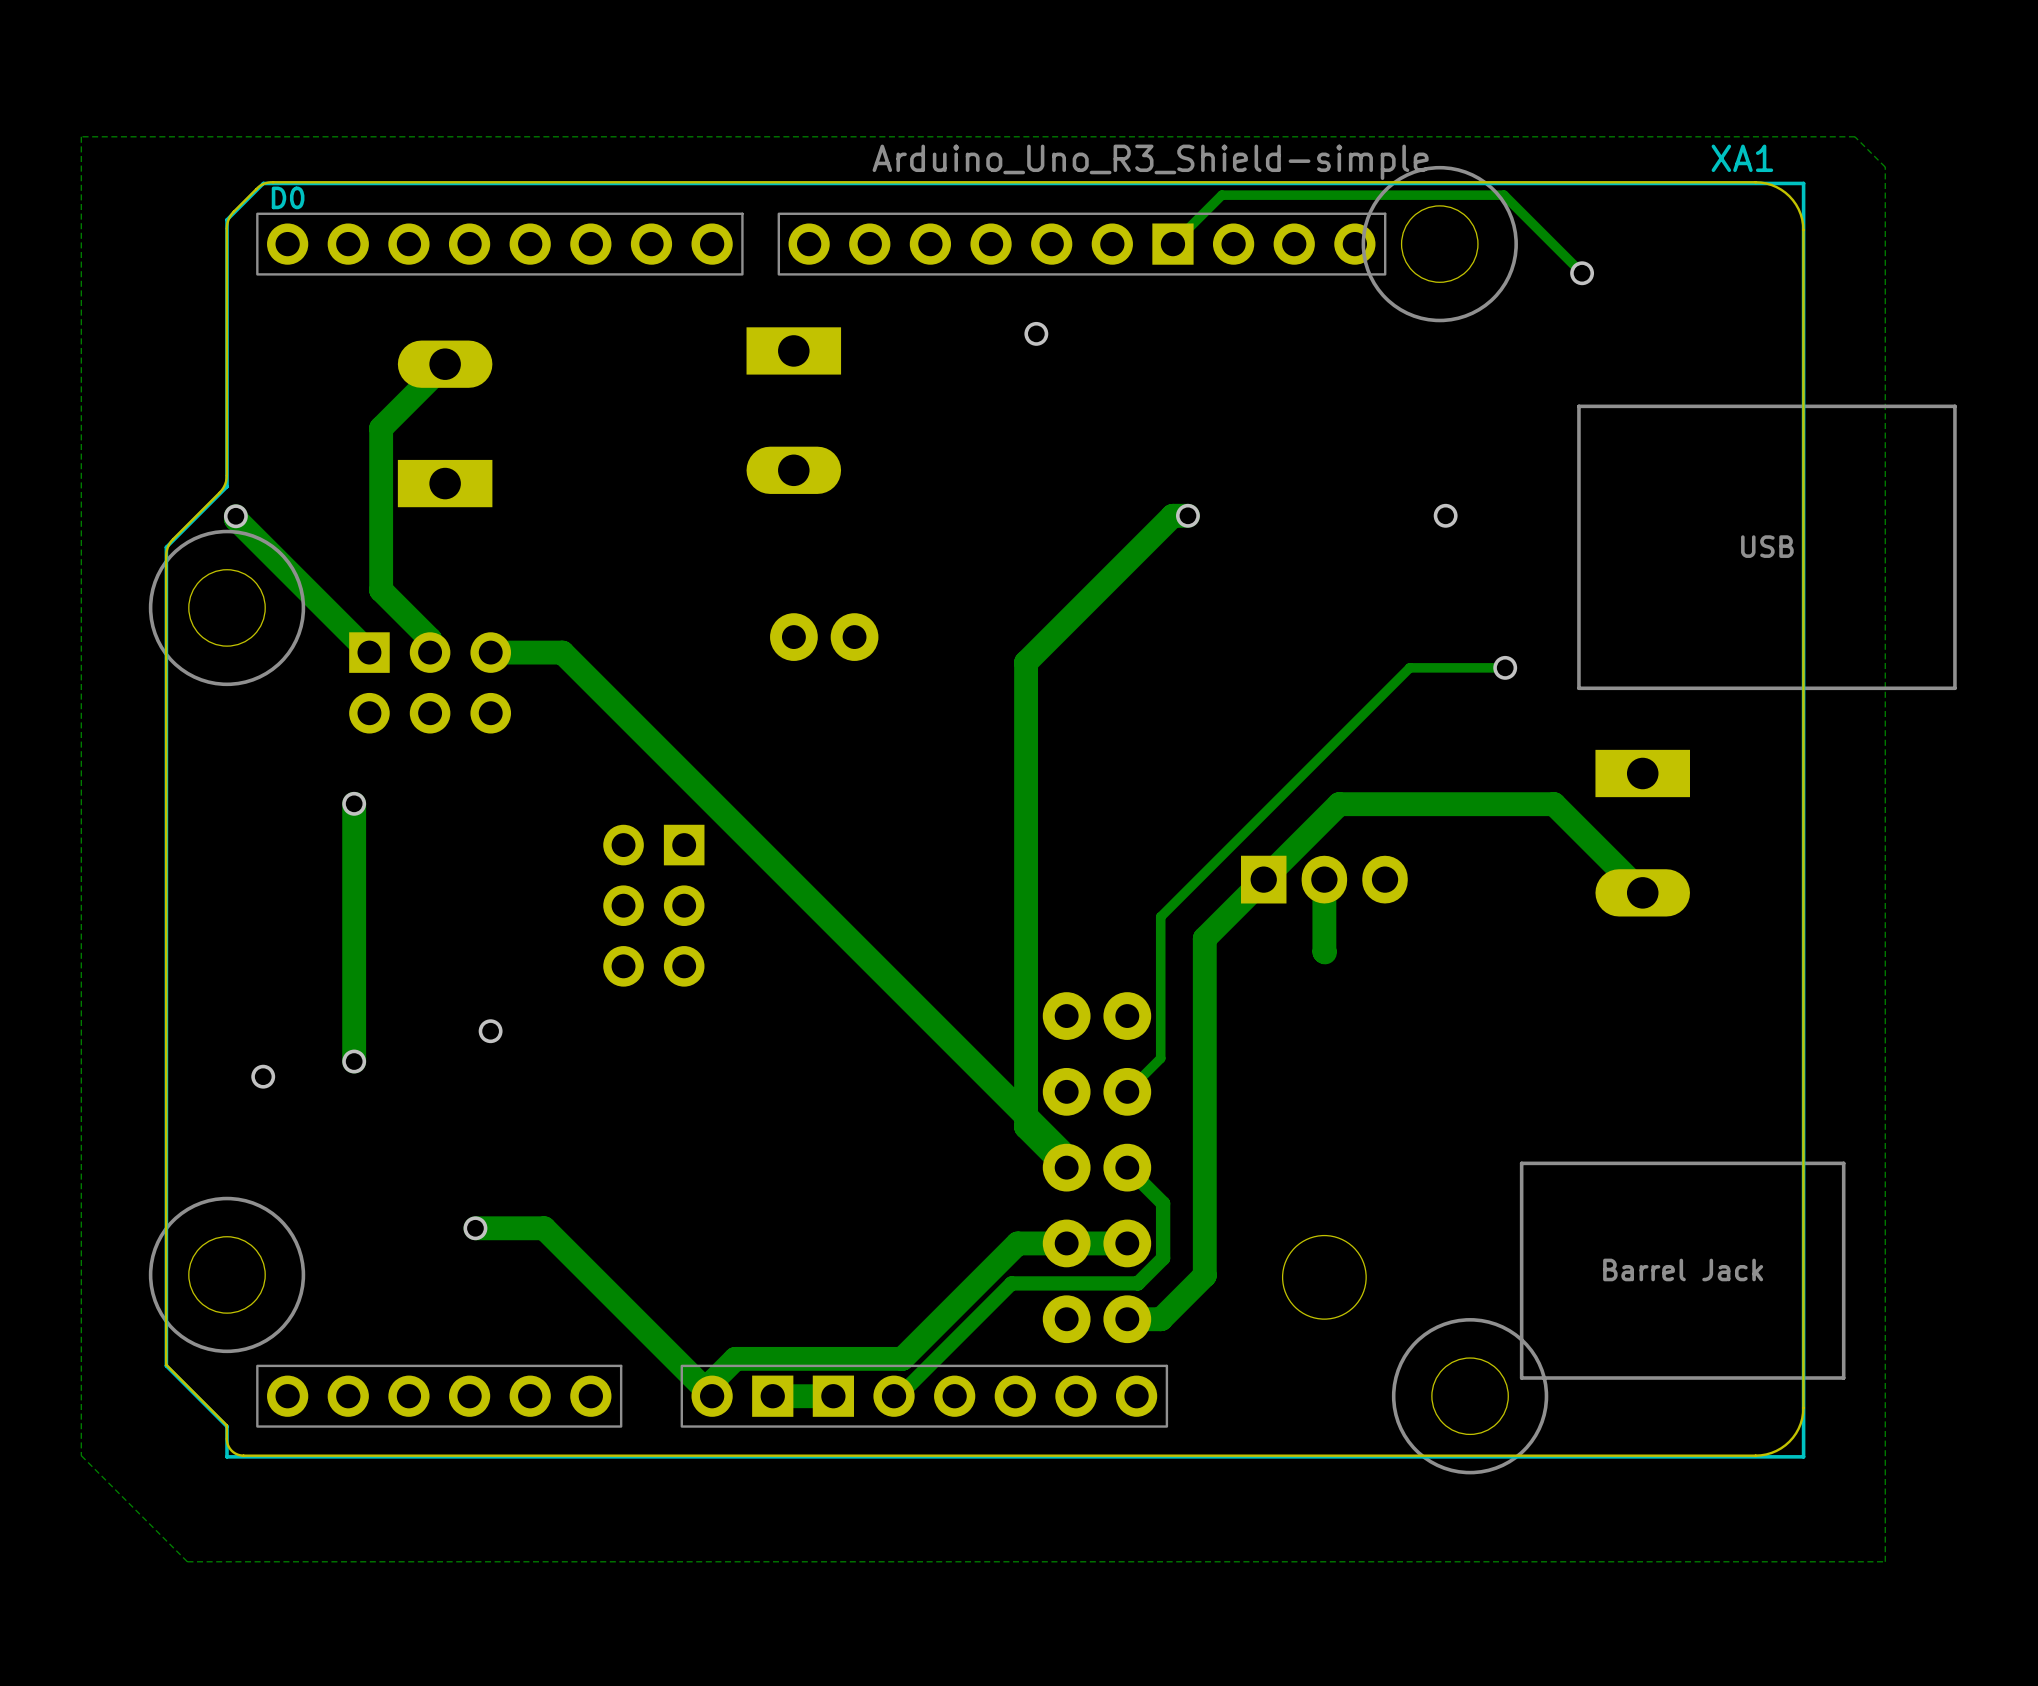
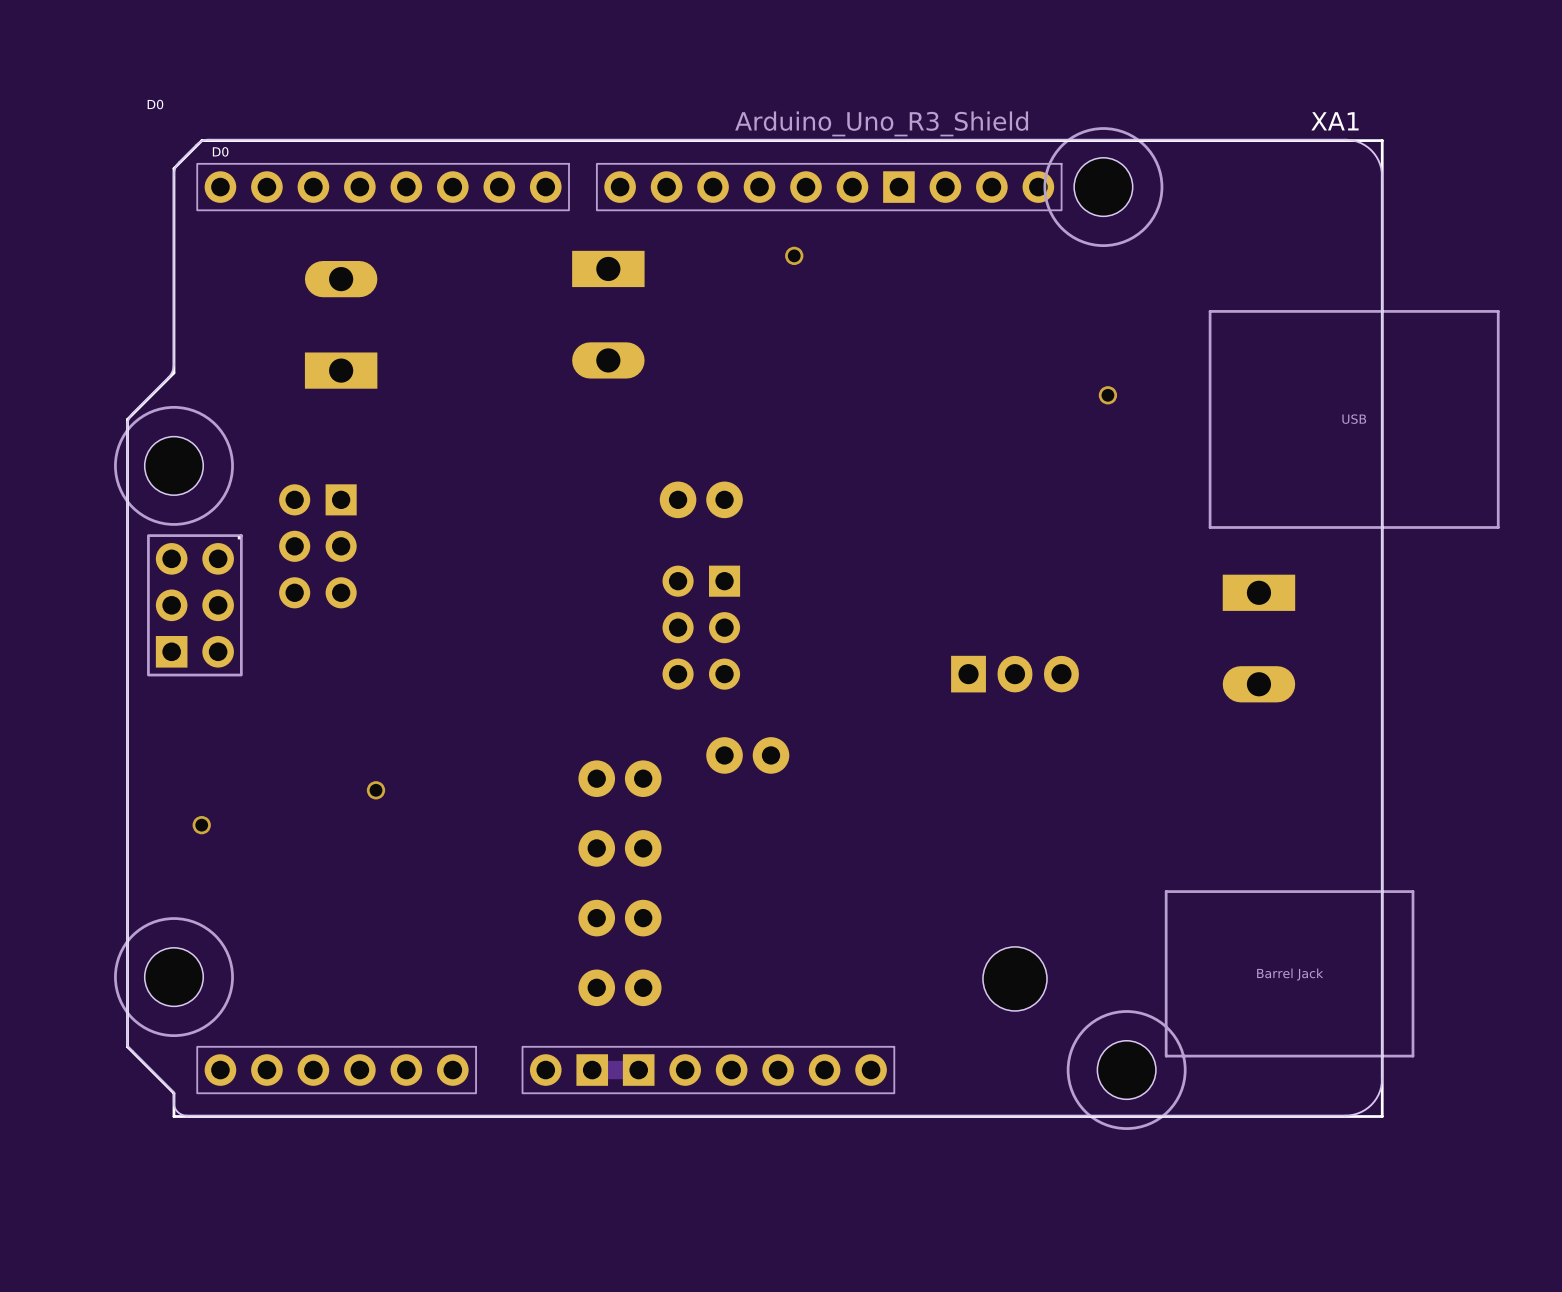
text: none -> D0 (155, 104)
zone outline: (1854, 136) (81, 136) (81, 1455) (187, 1561) (1885, 1561) (1885, 167) (1854, 136) -> none
XA1 value: Arduino_Uno_R3_Shield-simple (1150, 162) -> Arduino_Uno_R3_Shield (881, 123)
XA1 footprint: [148, 165, 1957, 1475] -> [114, 127, 1500, 1130]
track: (1172, 244) (1221, 195) (1504, 195) (1582, 273) -> none
via: (1582, 273) -> none
track: (445, 364) (381, 428) (381, 590) (430, 639) (430, 652) -> none
track: (1187, 515) (1172, 515) (1026, 662) (1026, 1127) (1066, 1167) -> none
via: (1187, 515) -> none
track: (235, 516) (235, 519) (369, 652) -> none
via: (235, 516) -> none
part position: (824, 637) -> (701, 499)
track: (490, 652) (562, 652) (1066, 1156) -> none
track: (1505, 667) (1409, 667) (1160, 916) (1160, 1058) (1127, 1091) -> none
via: (1505, 667) -> none
part rotation: 0° (430, 682) -> 90° clockwise (317, 546)
track: (354, 803) (354, 1061) -> none
via: (354, 803) -> none
part: none -> (701, 627)
track: (1324, 879) (1324, 952) -> none
track: (1642, 892) (1554, 804) (1339, 804) (1204, 938) (1204, 1275) (1161, 1319) (1127, 1319) -> none
part: (653, 905) -> none
part: none -> (747, 755)
part: none -> (619, 778)
part: (1096, 1016) -> none
via: (354, 1061) -> none
part: (1096, 1091) -> none
part: none -> (619, 848)
part: (1096, 1167) -> none
track: (1127, 1167) (1163, 1203) (1163, 1258) (1137, 1283) (1011, 1283) (898, 1396) -> none
part: none -> (619, 918)
track: (475, 1228) (544, 1228) (712, 1396) (712, 1382) (735, 1358) (902, 1358) (1017, 1243) (1127, 1243) -> none
via: (475, 1228) -> none
part: (1096, 1243) -> none
part: none -> (619, 987)
part: (1096, 1319) -> none

